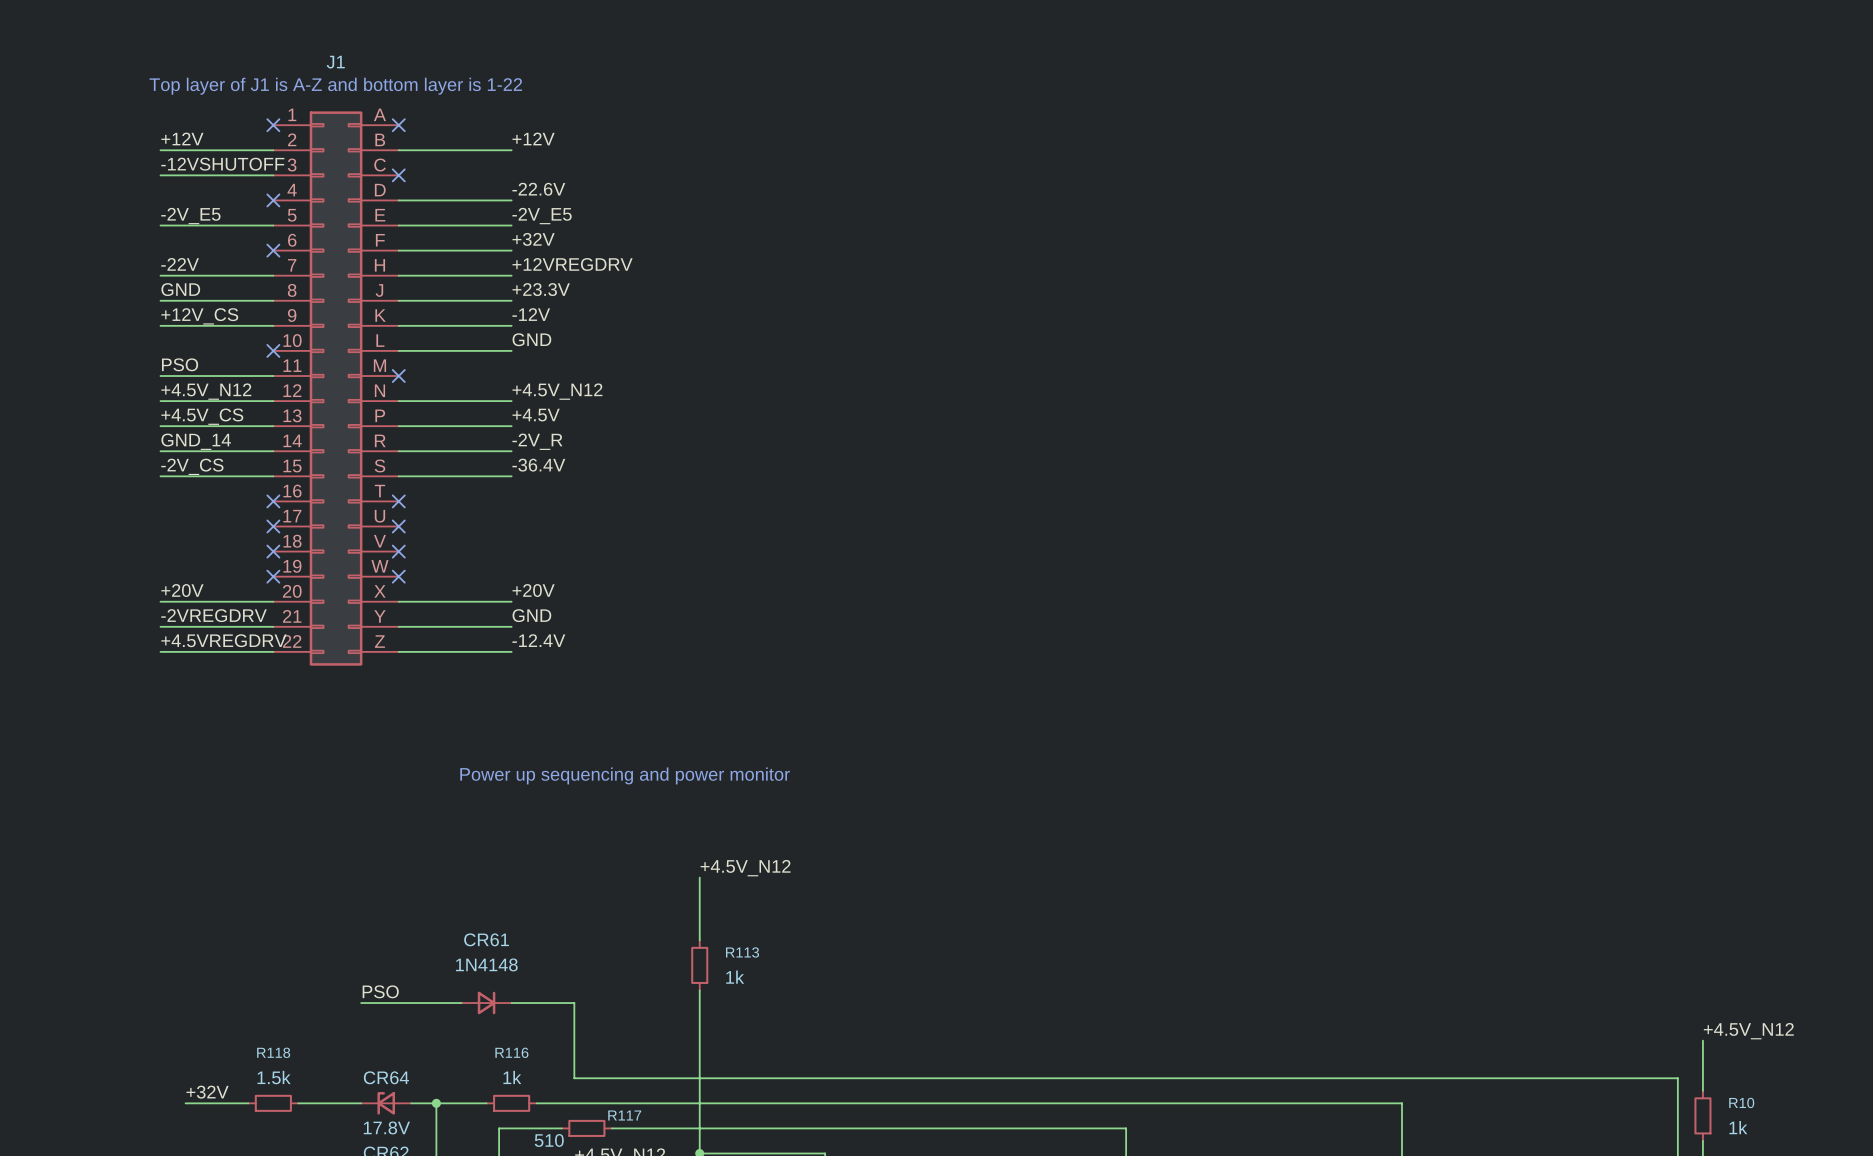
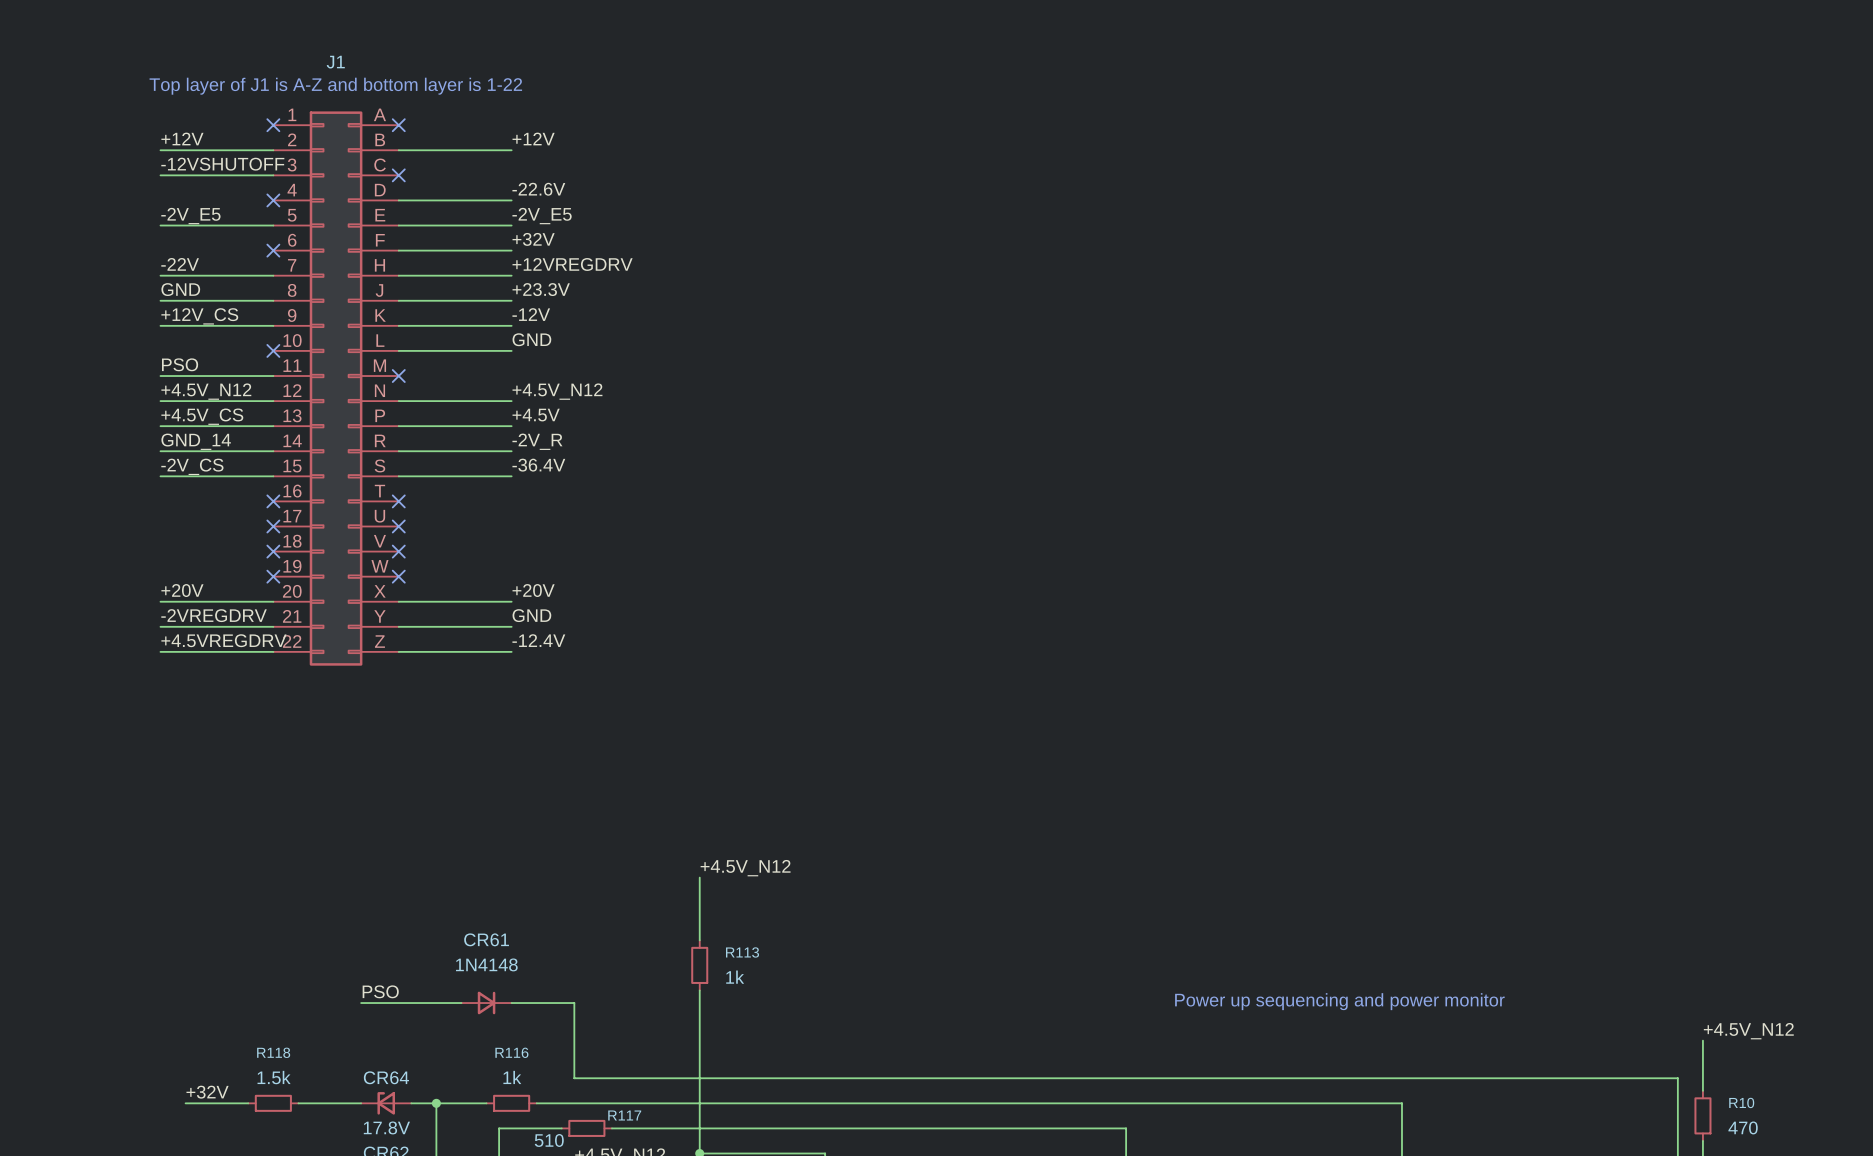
text: Power up sequencing and power monitor (625, 775) -> none
text: none -> Power up sequencing and power monitor (1339, 1001)
R10 value: 1k (1738, 1127) -> 470 (1743, 1127)

